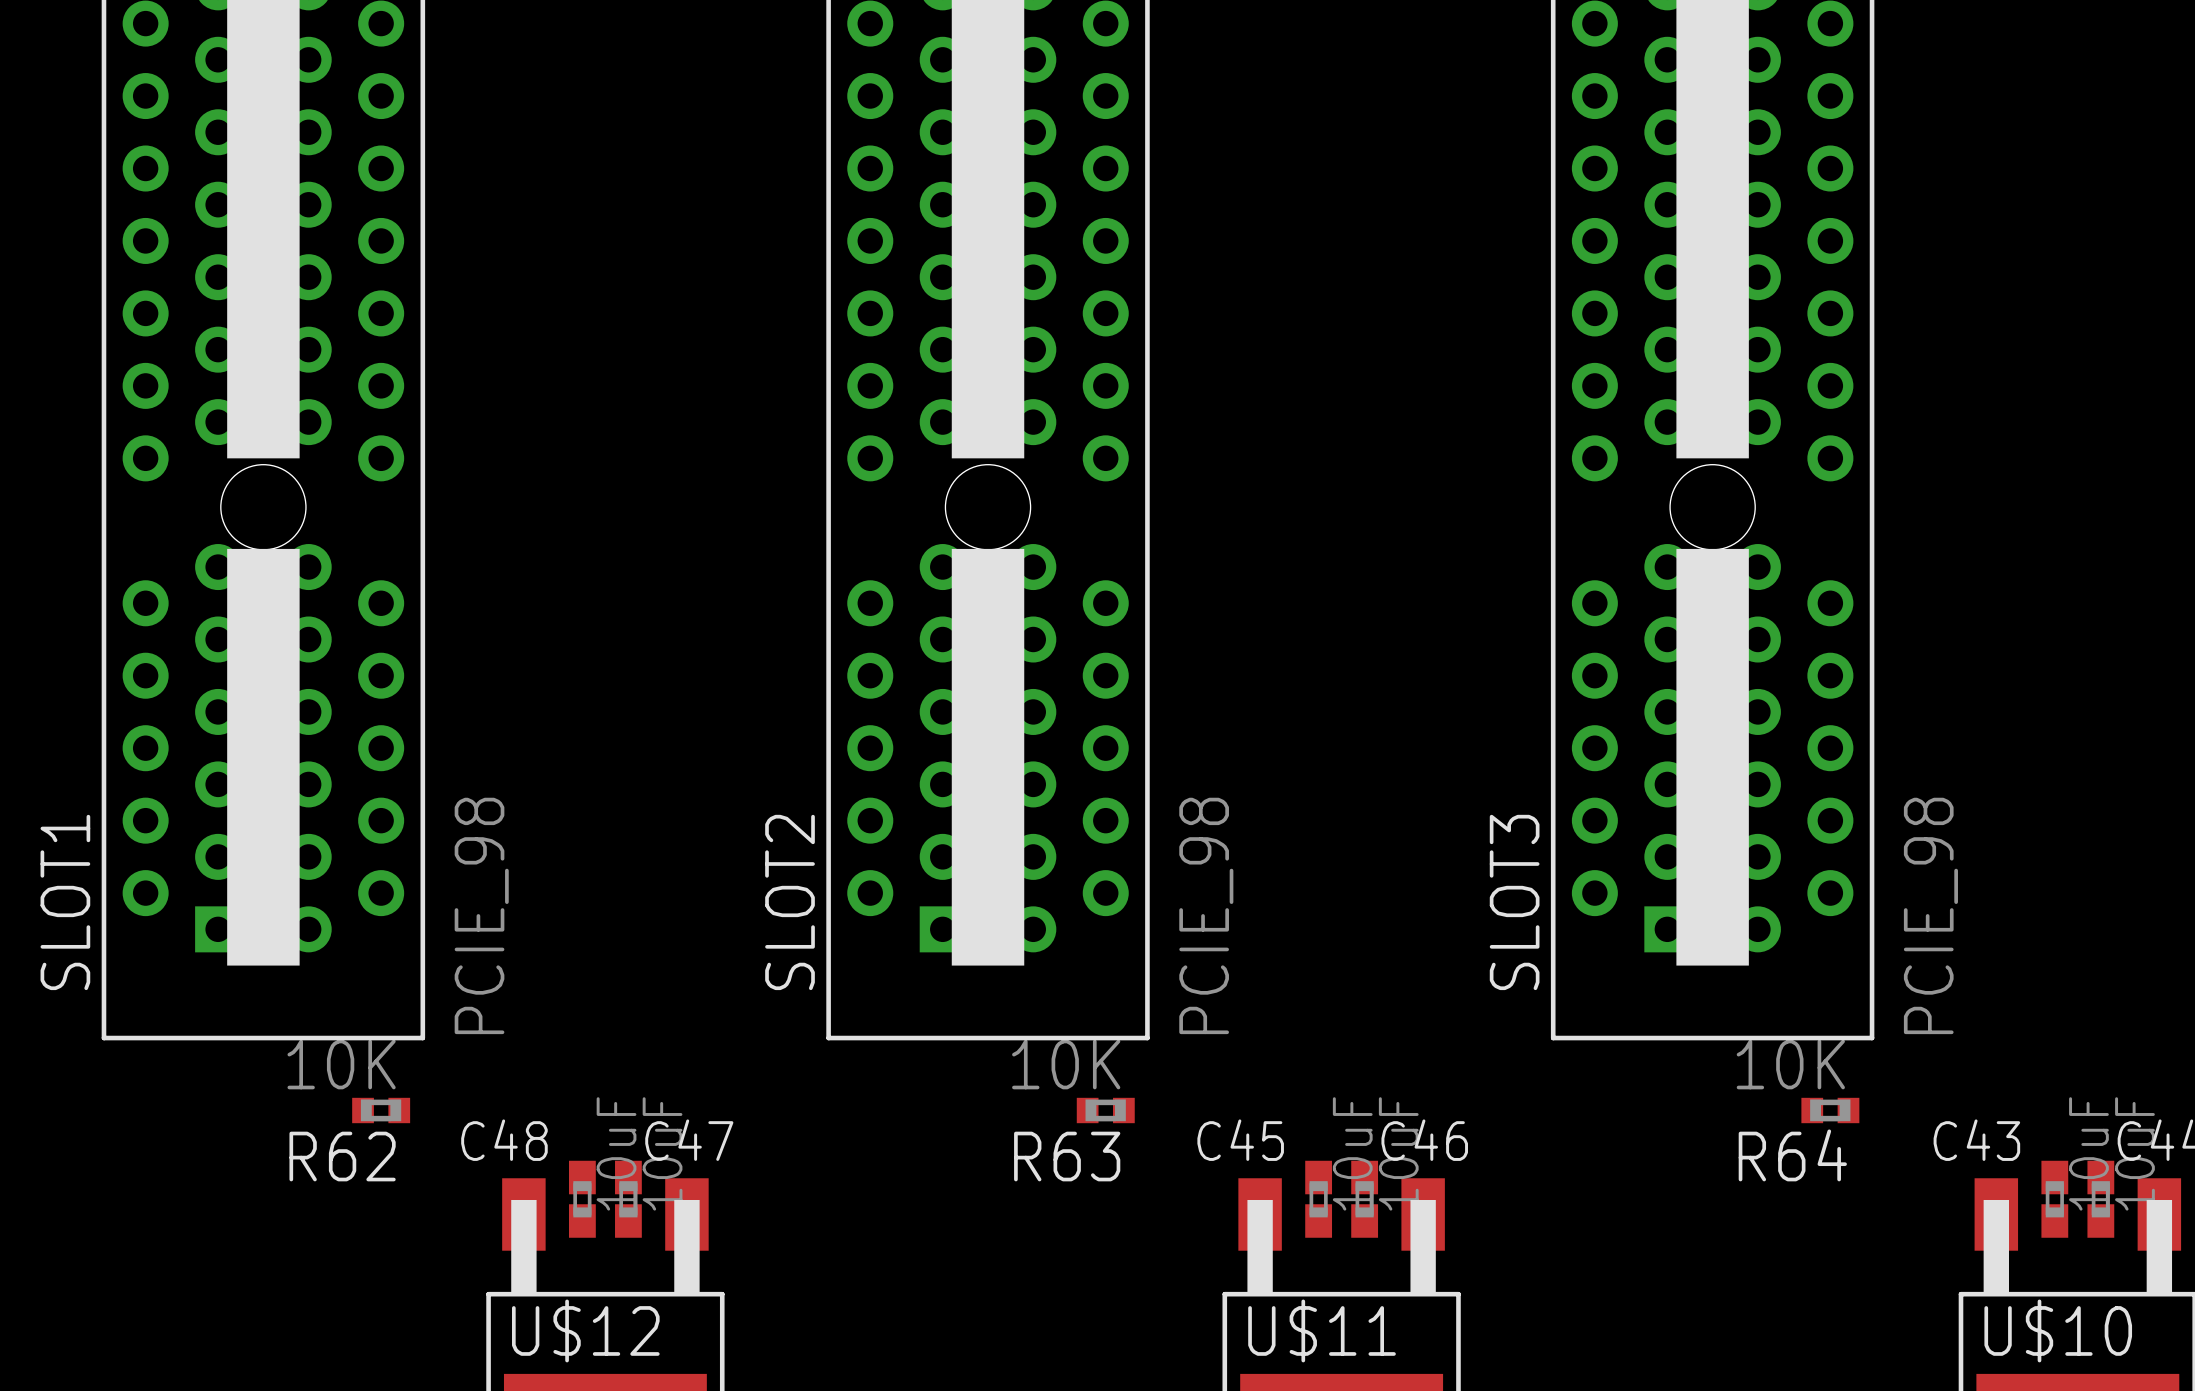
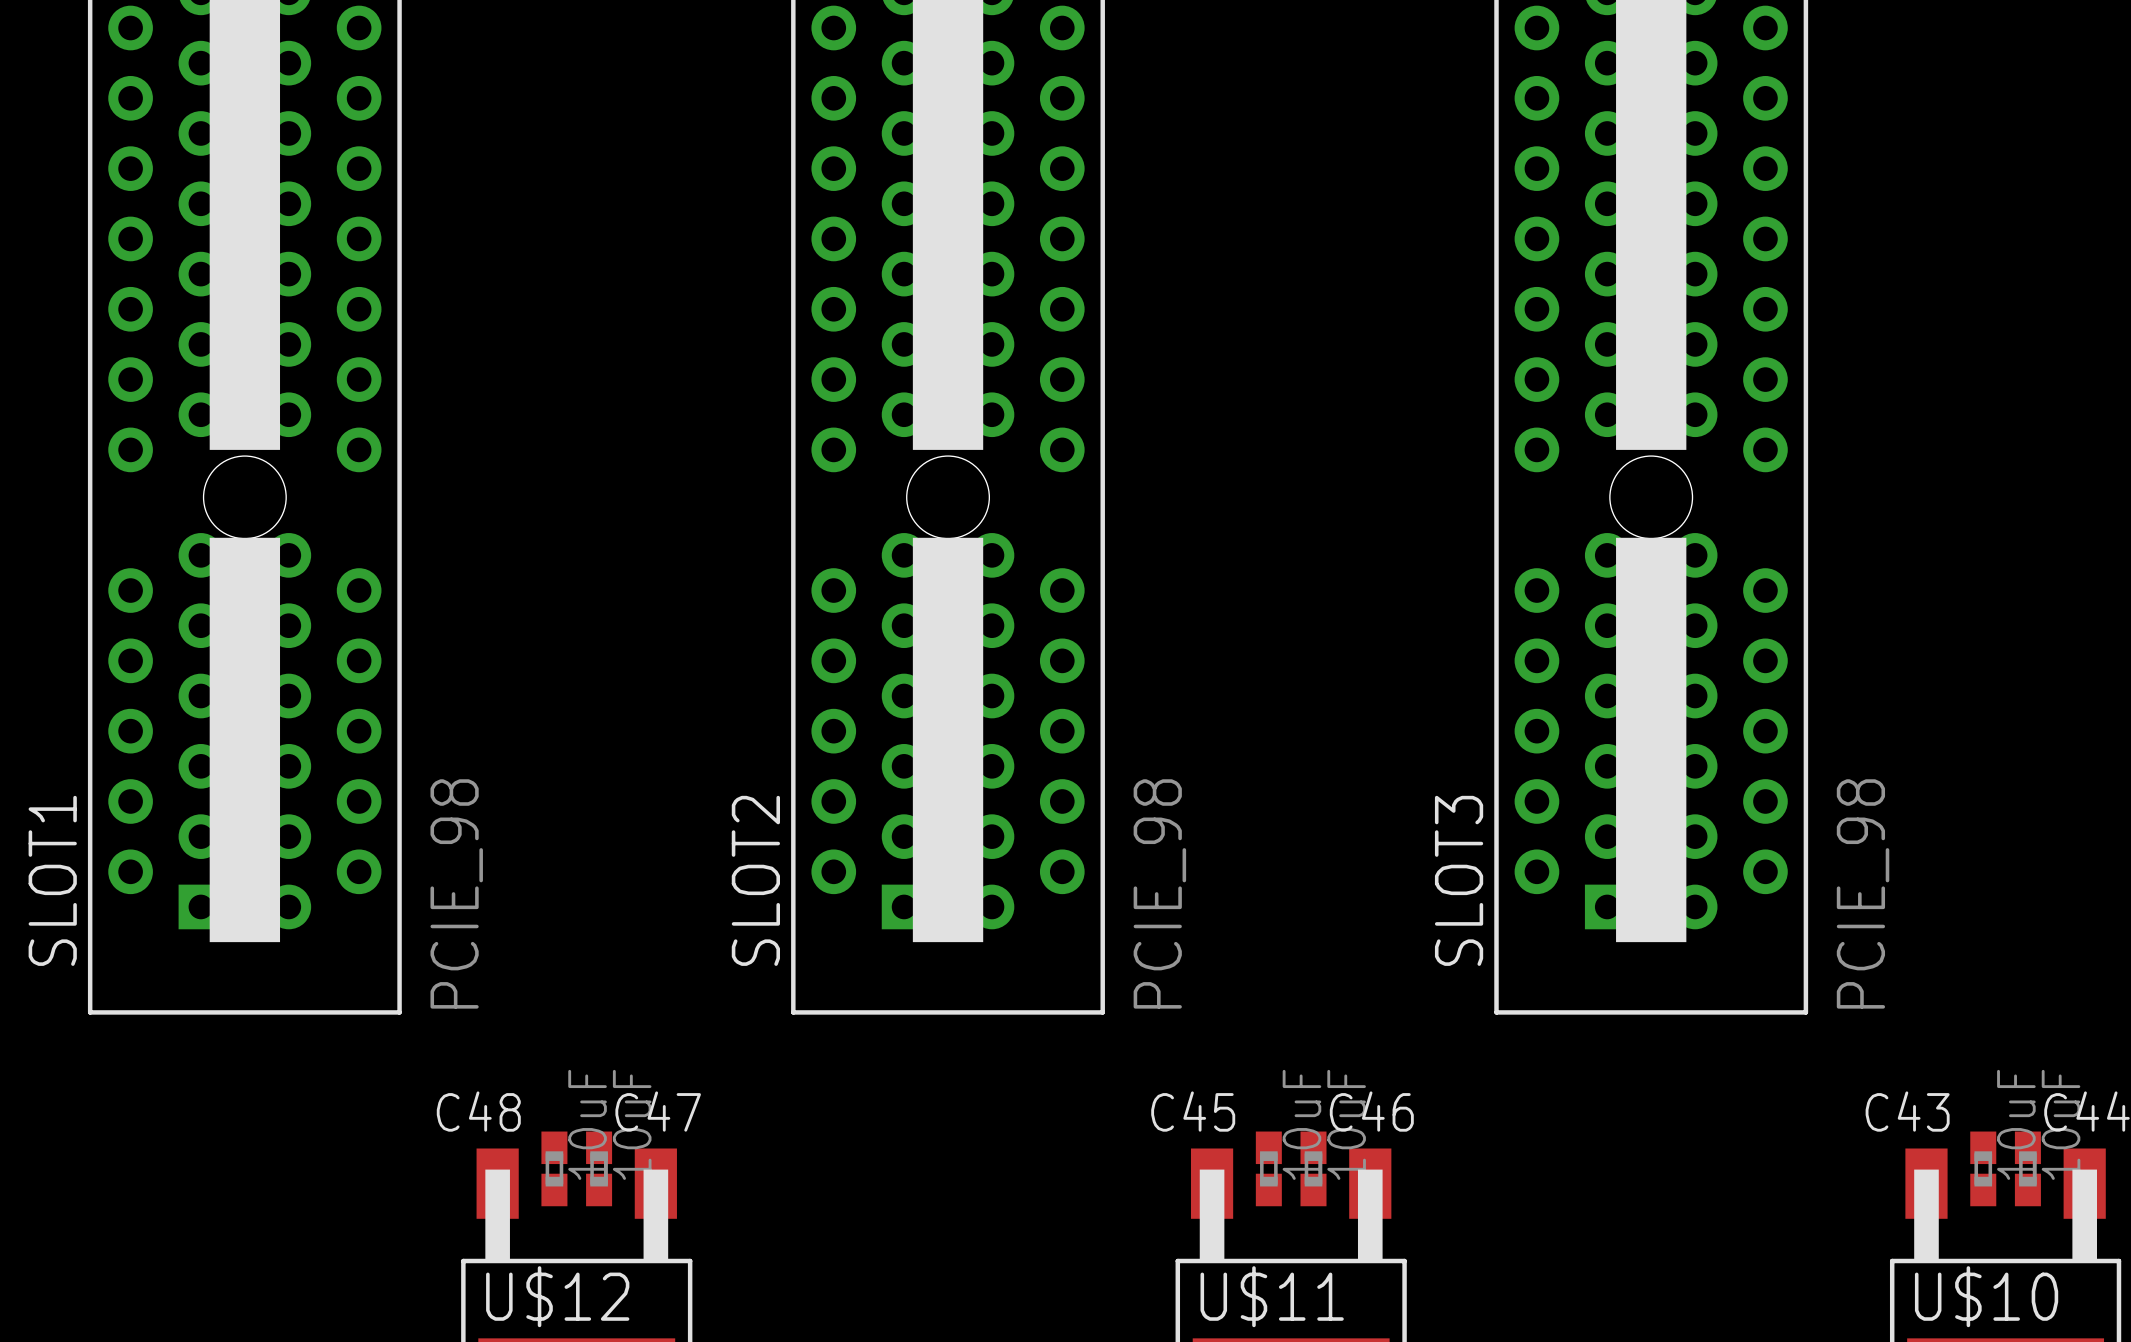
R62: 10K (381, 1110) -> none
R63: 10K (1105, 1110) -> none
R64: 10K (1830, 1110) -> none

